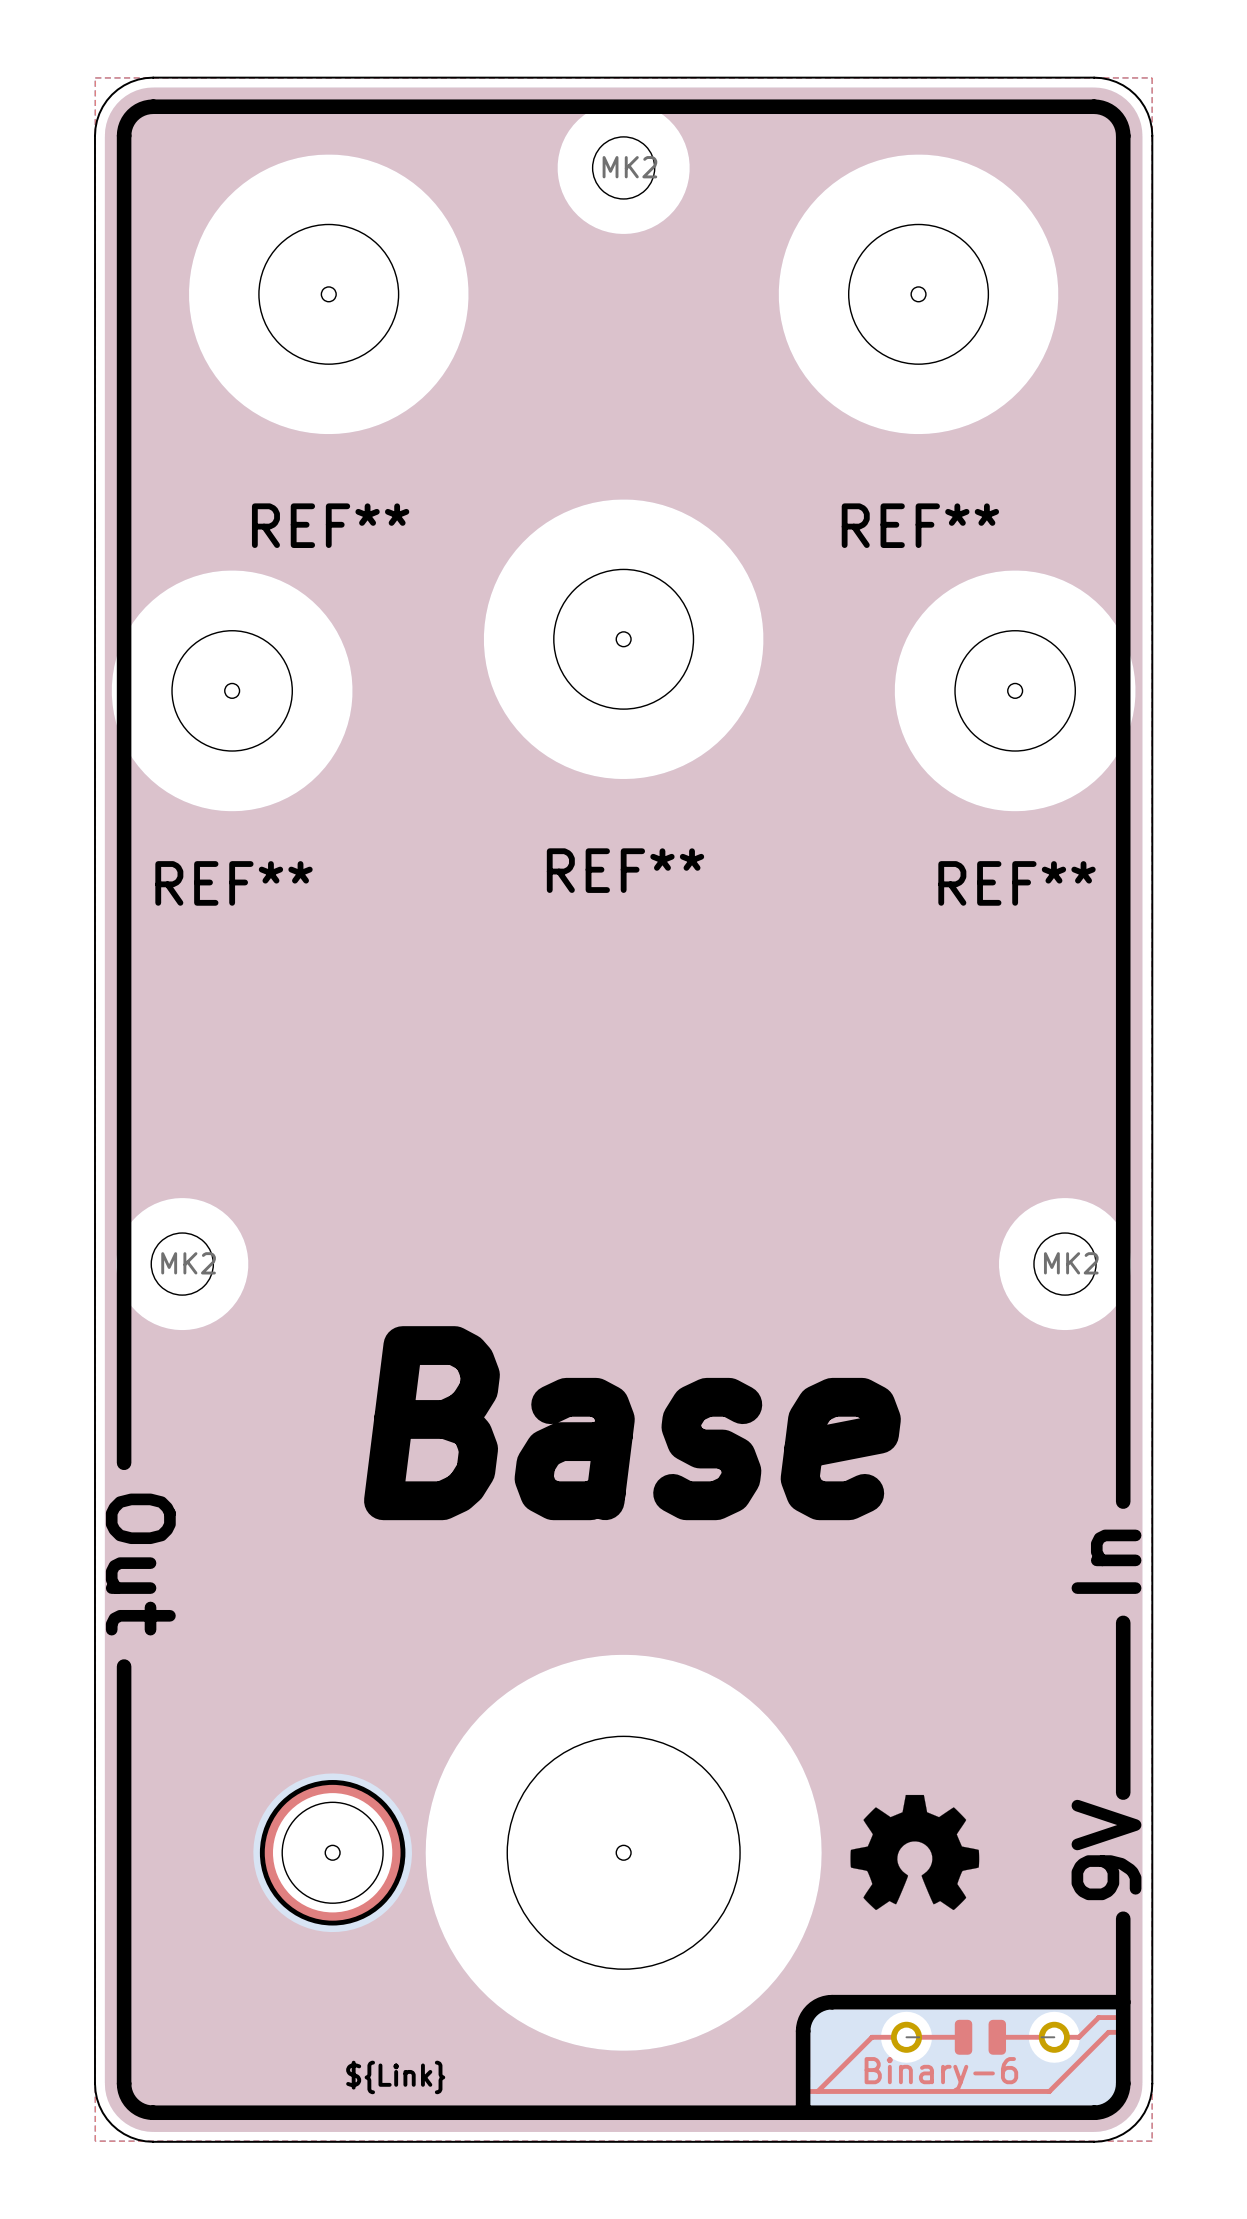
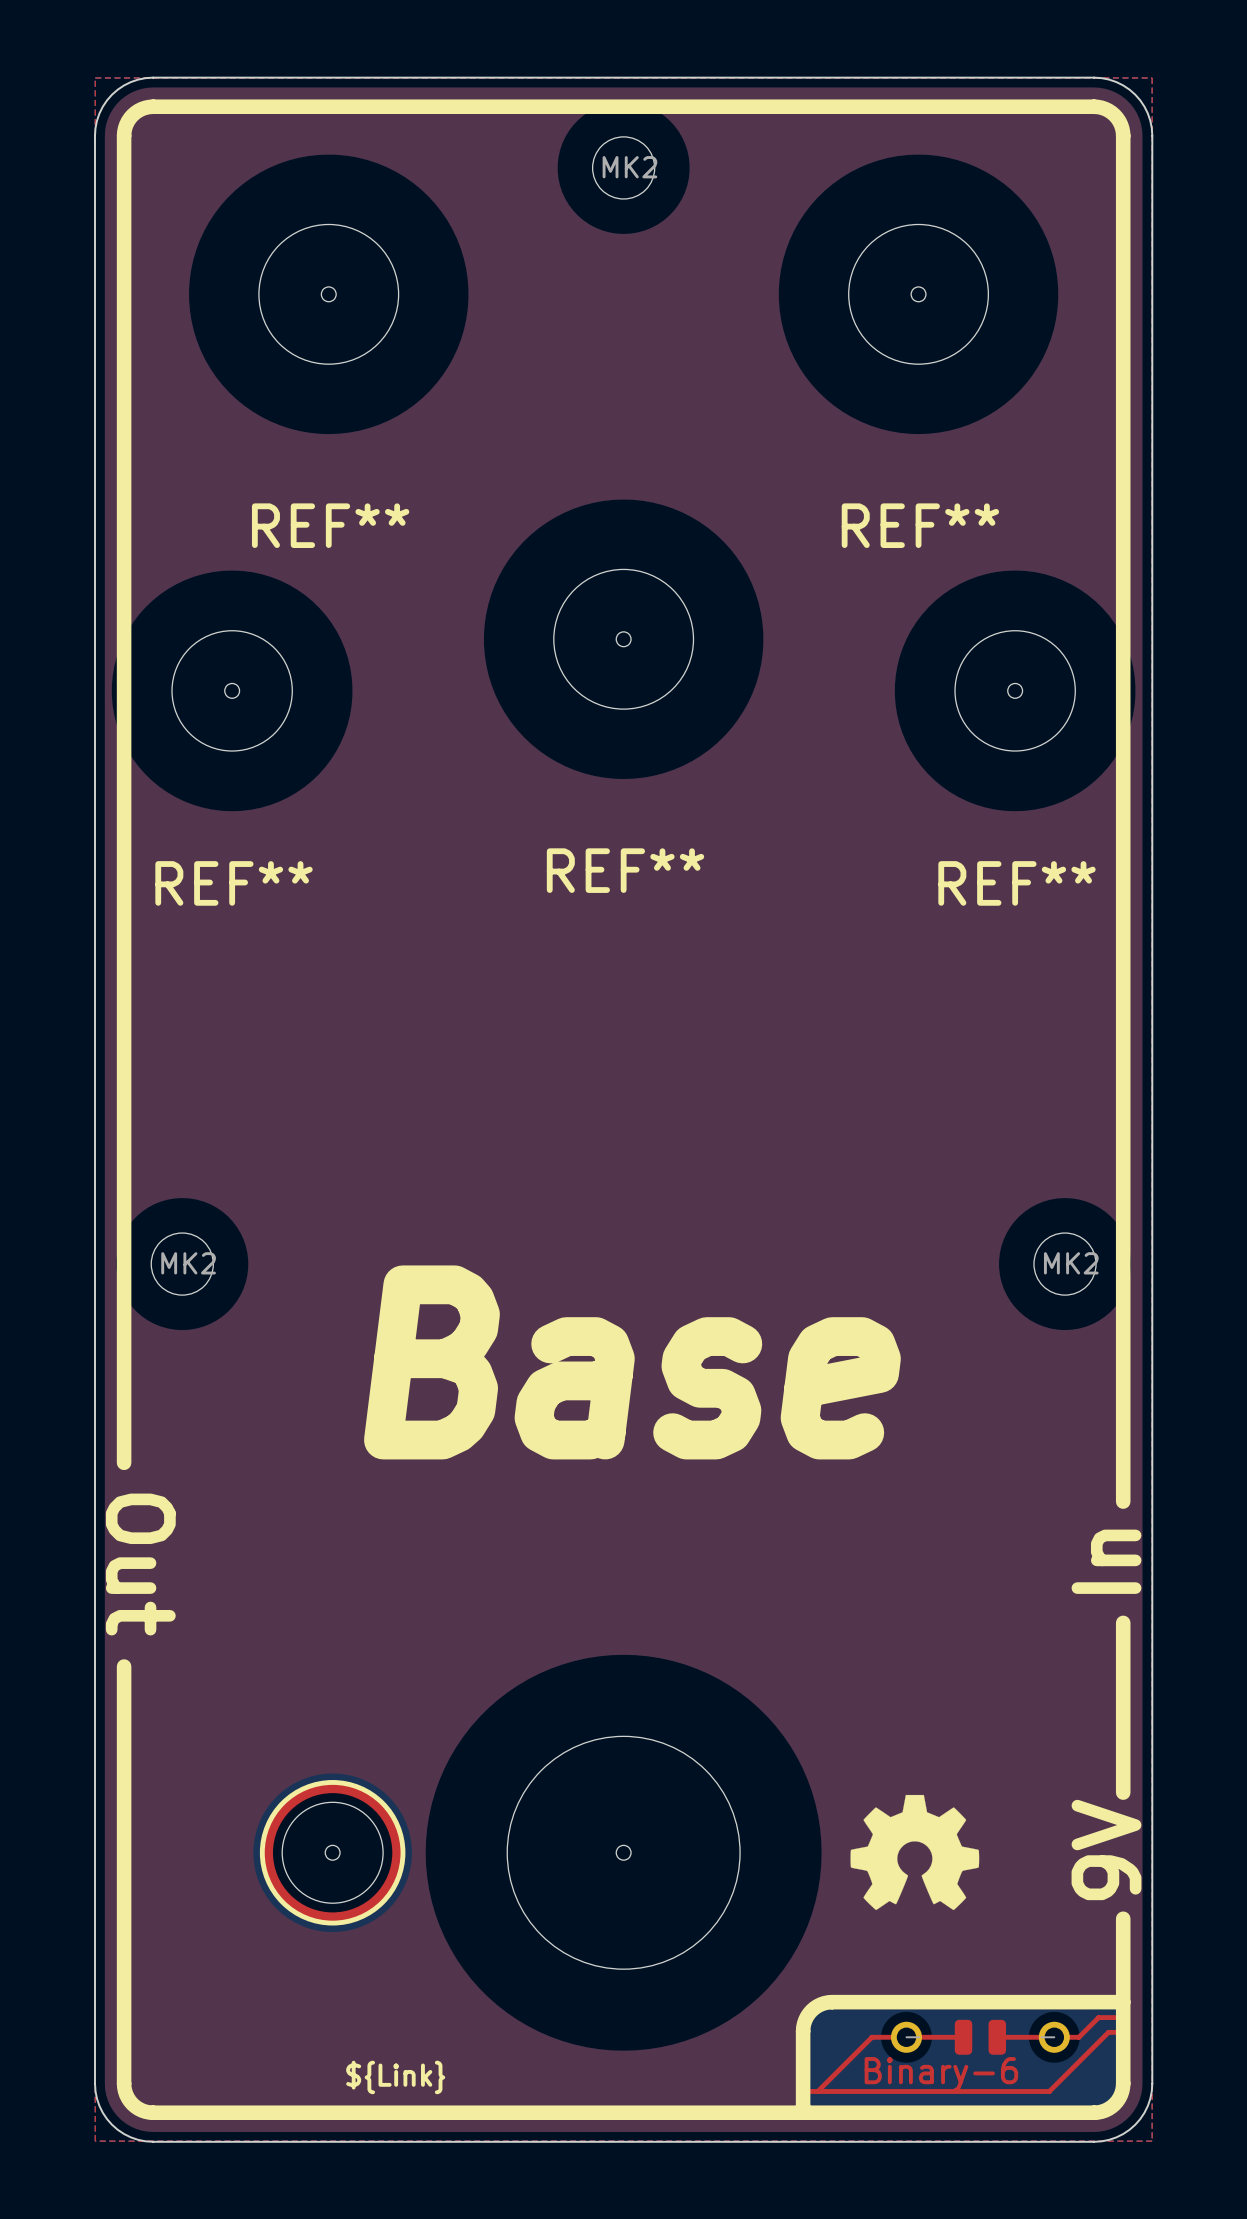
text position: Base (632, 1423) -> Base (632, 1362)

